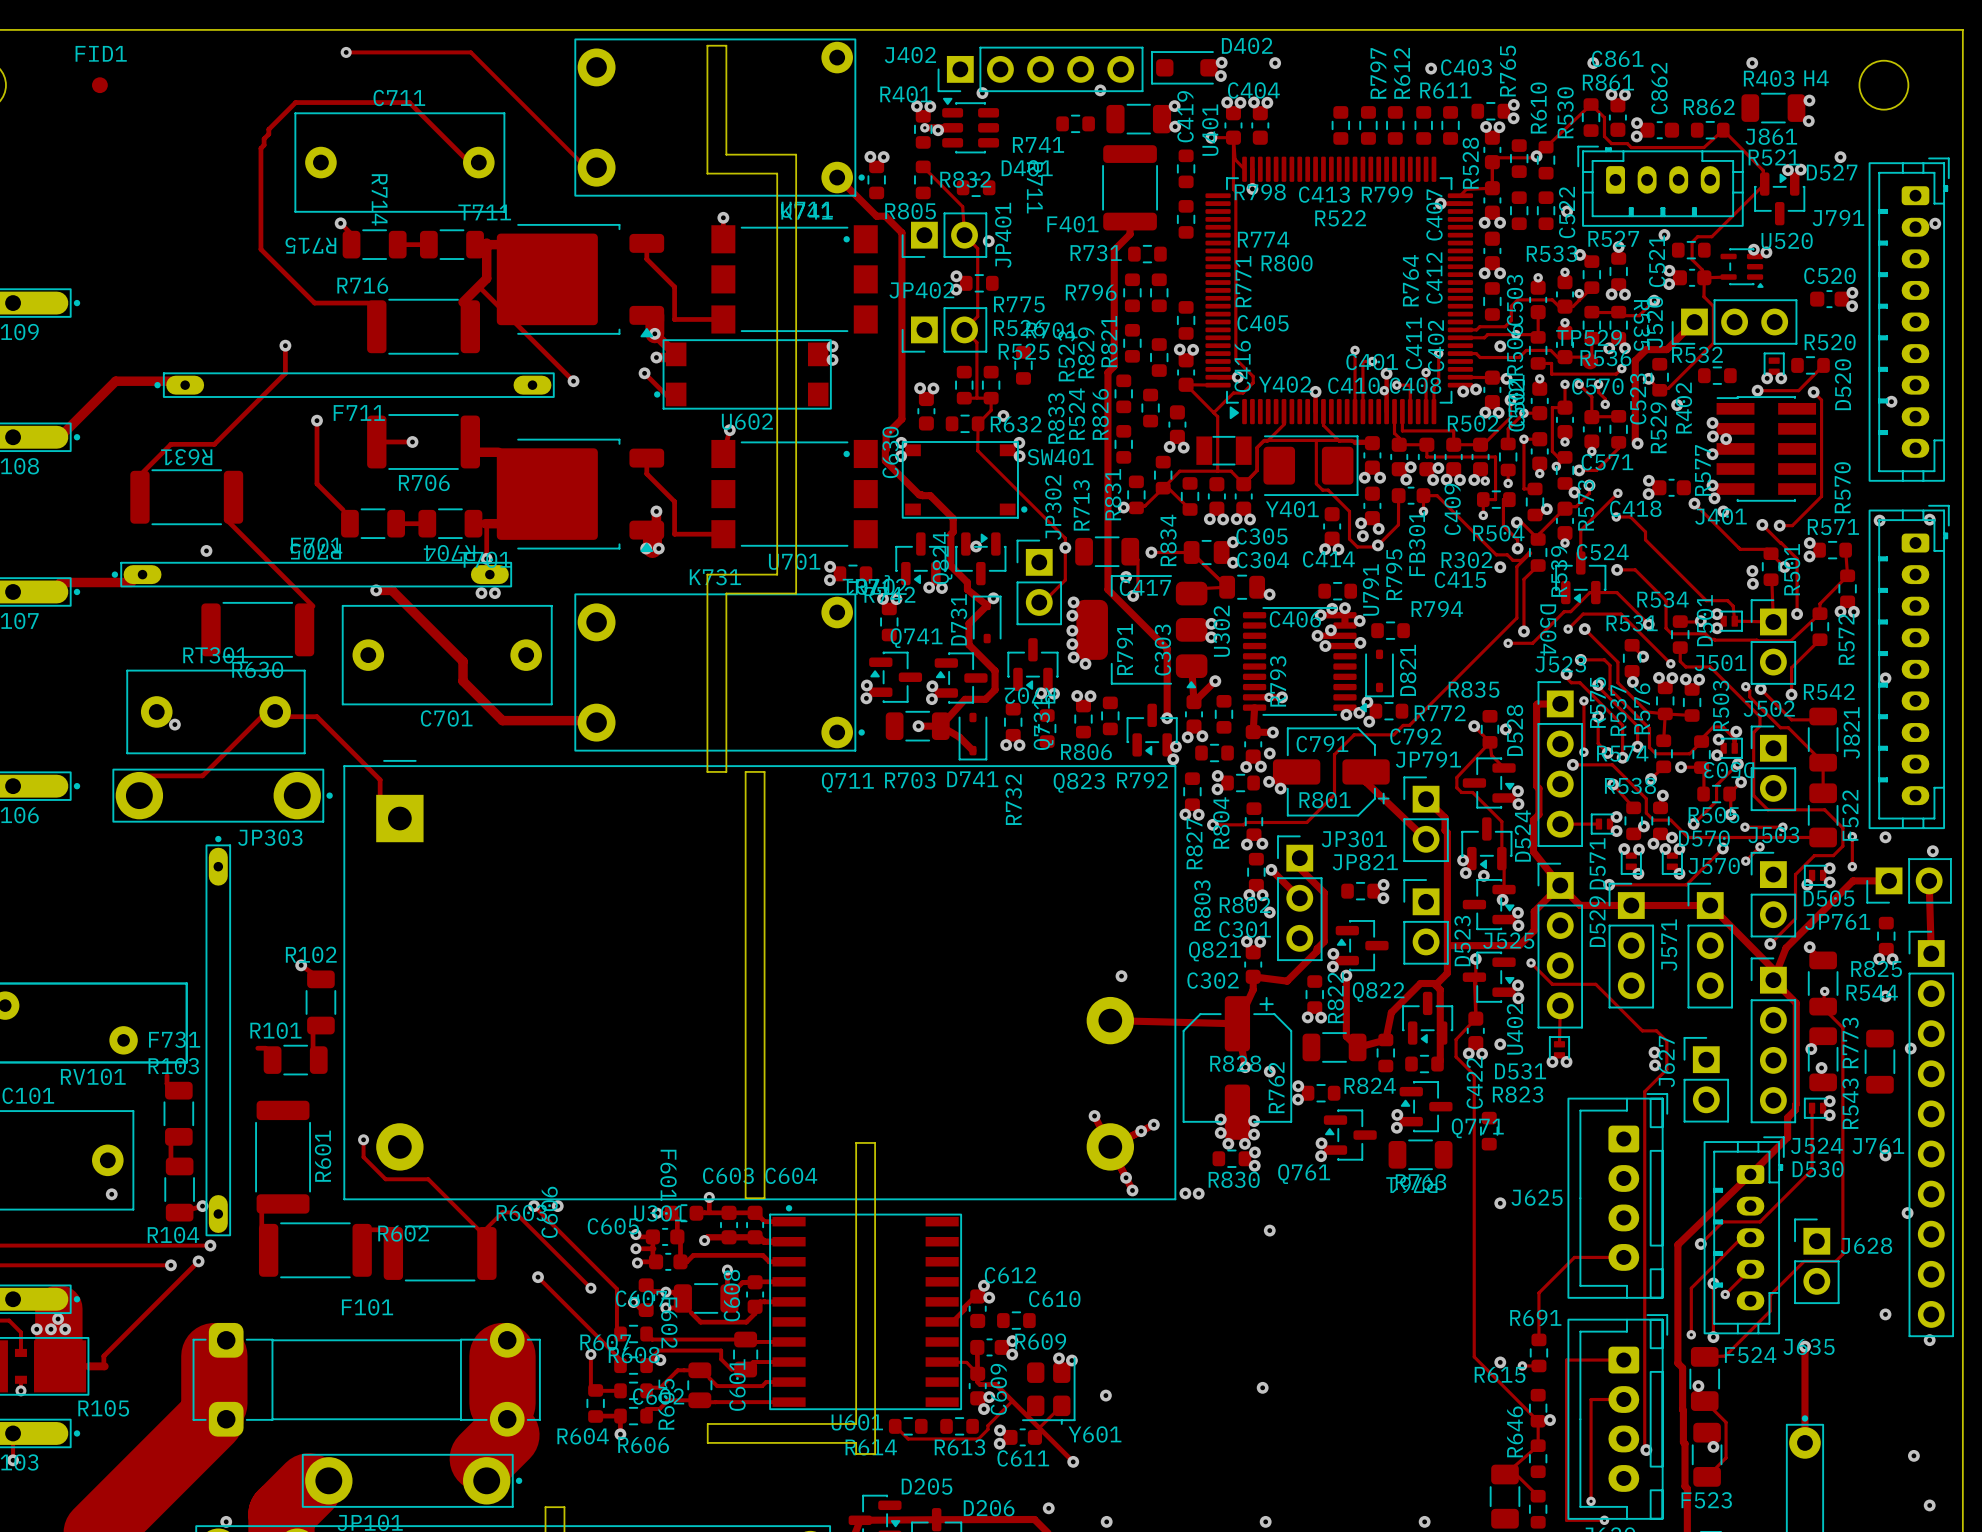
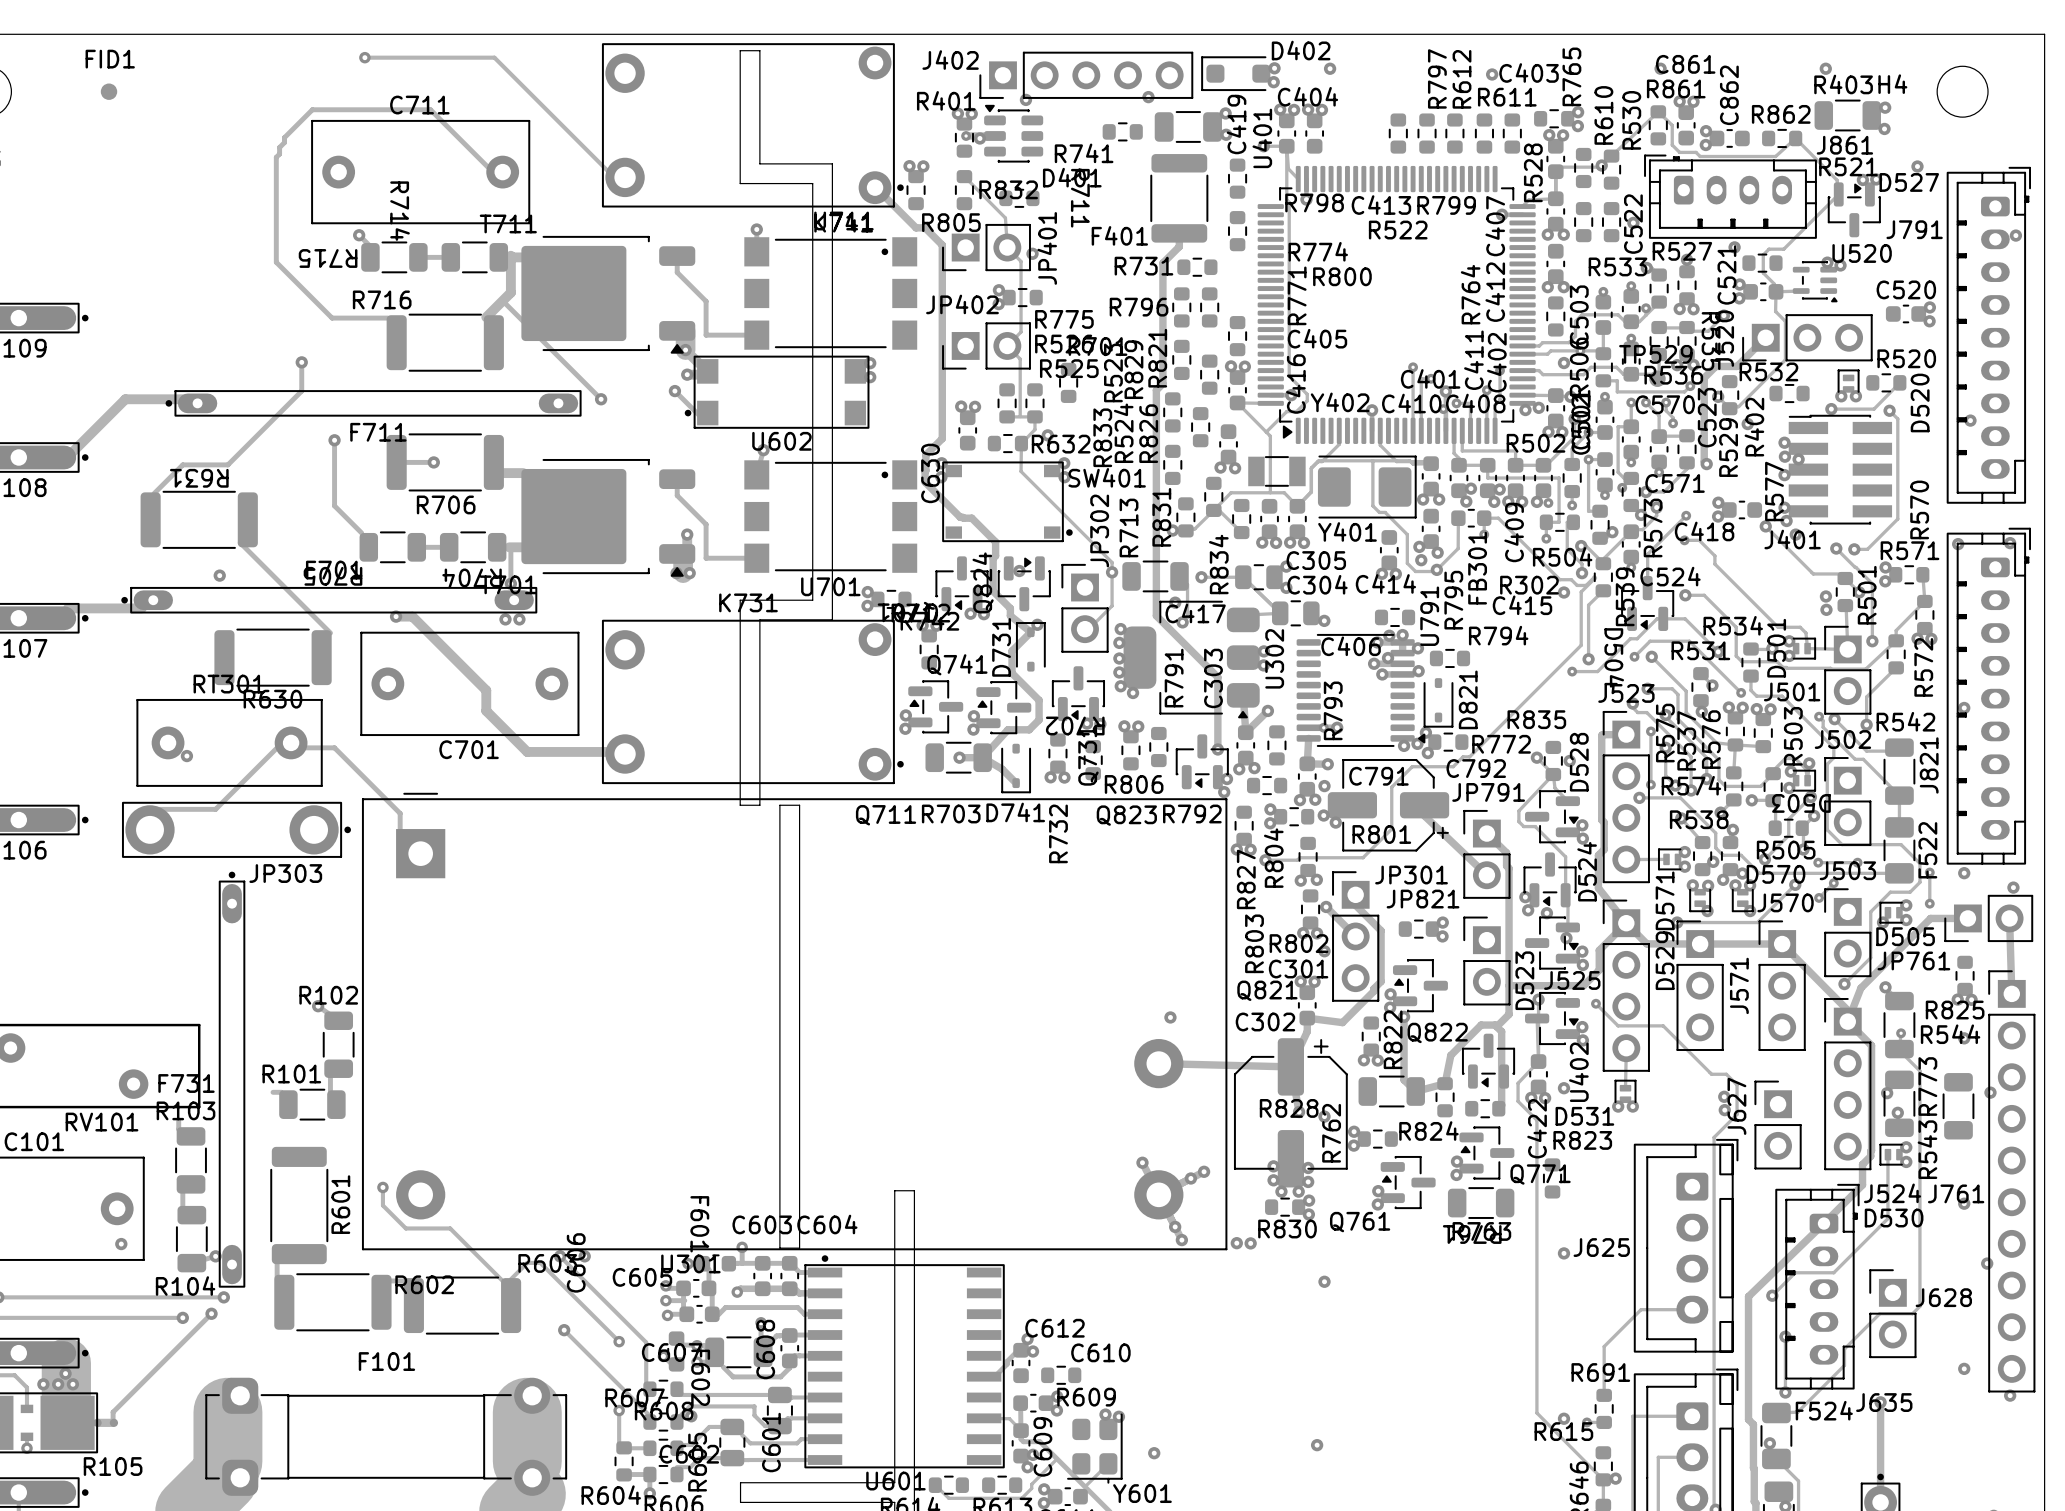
track: (1750, 1237) (1741, 1237) (1691, 1288) (1691, 1334) -> none
track: (1750, 1269) (1725, 1294) -> none
via: (1725, 1294) -> none
via: (1691, 1334) -> none

